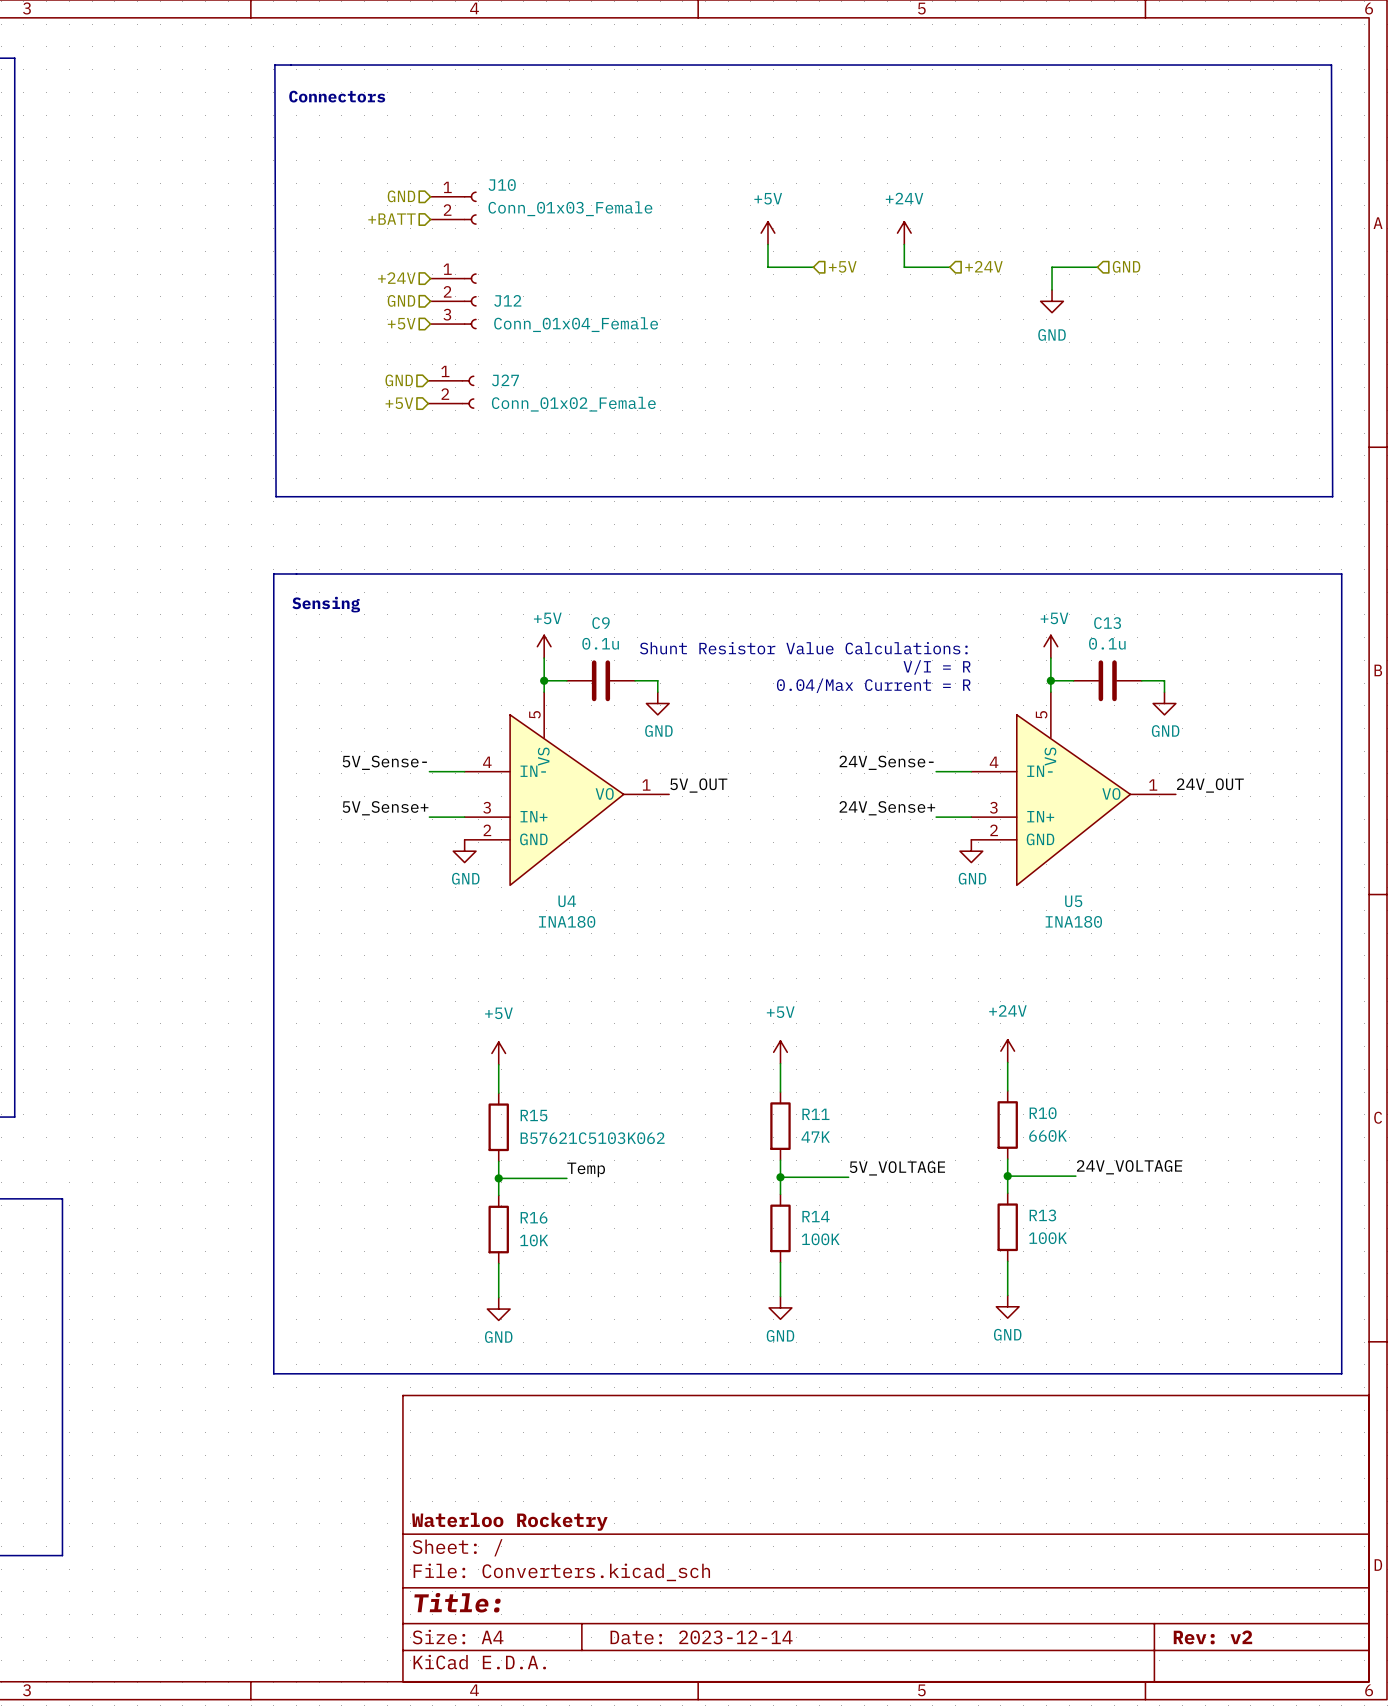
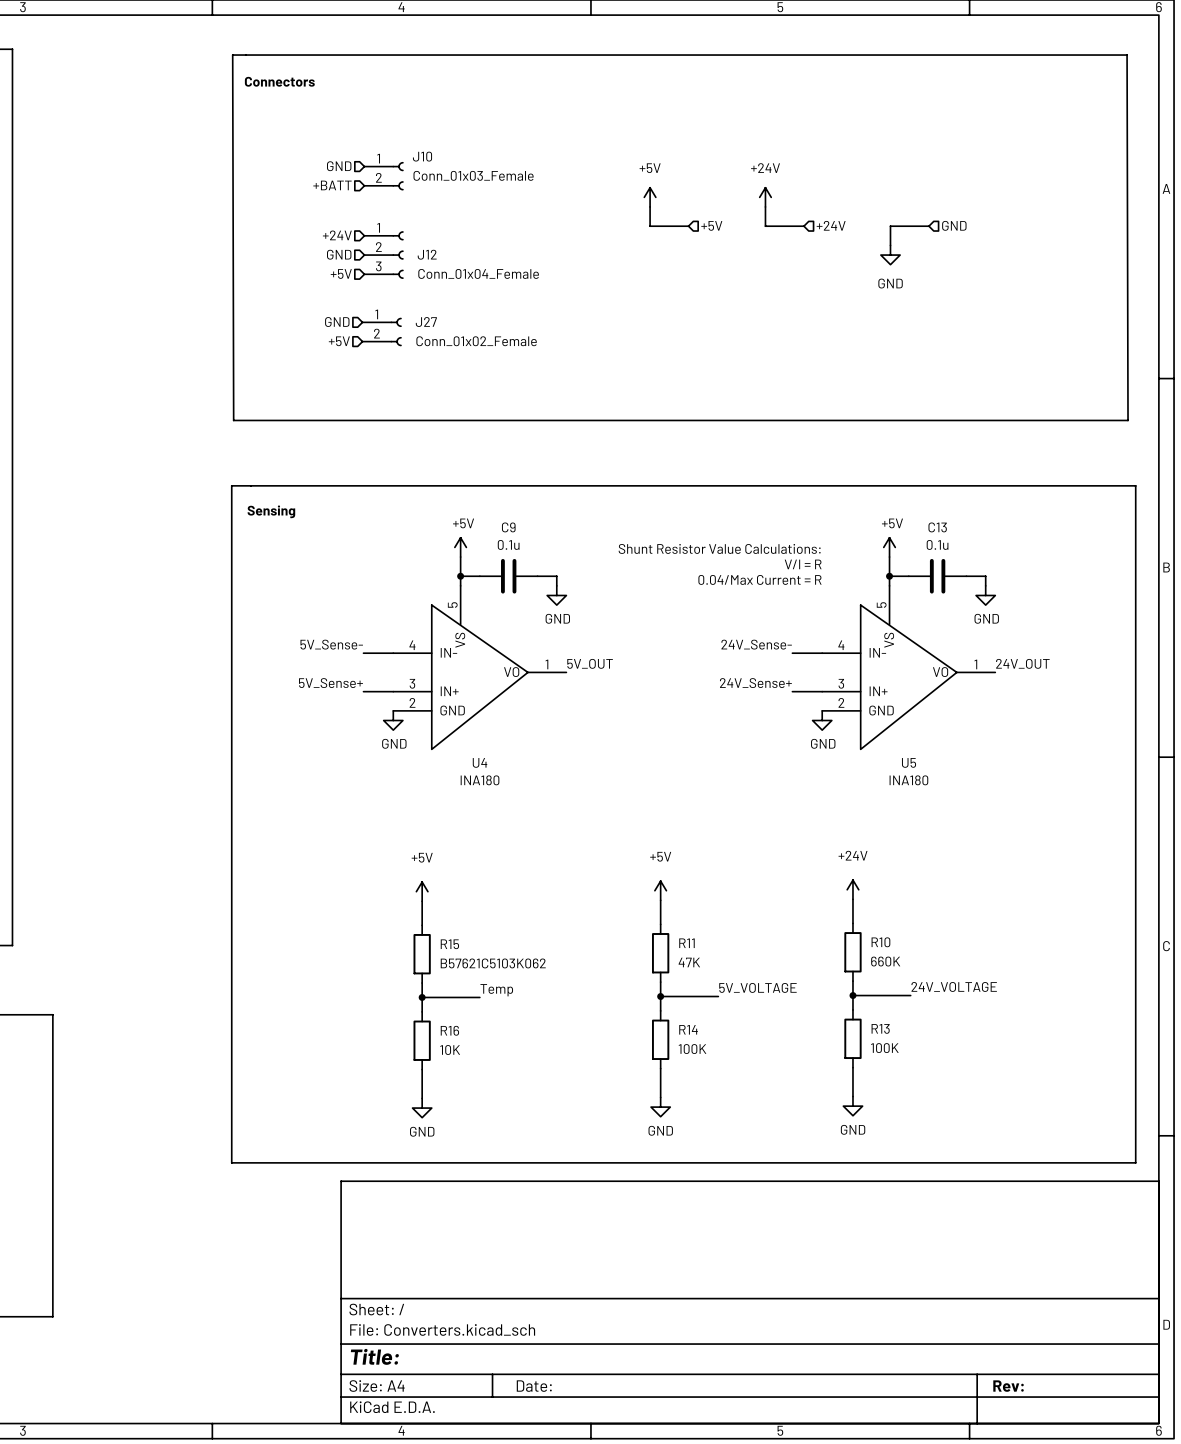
title block: Waterloo Rocketry (509, 1521) -> none
title block: Date: 2023-12-14 (701, 1637) -> Date: (534, 1386)
title block: Rev: v2 (1212, 1637) -> Rev: (1008, 1386)

